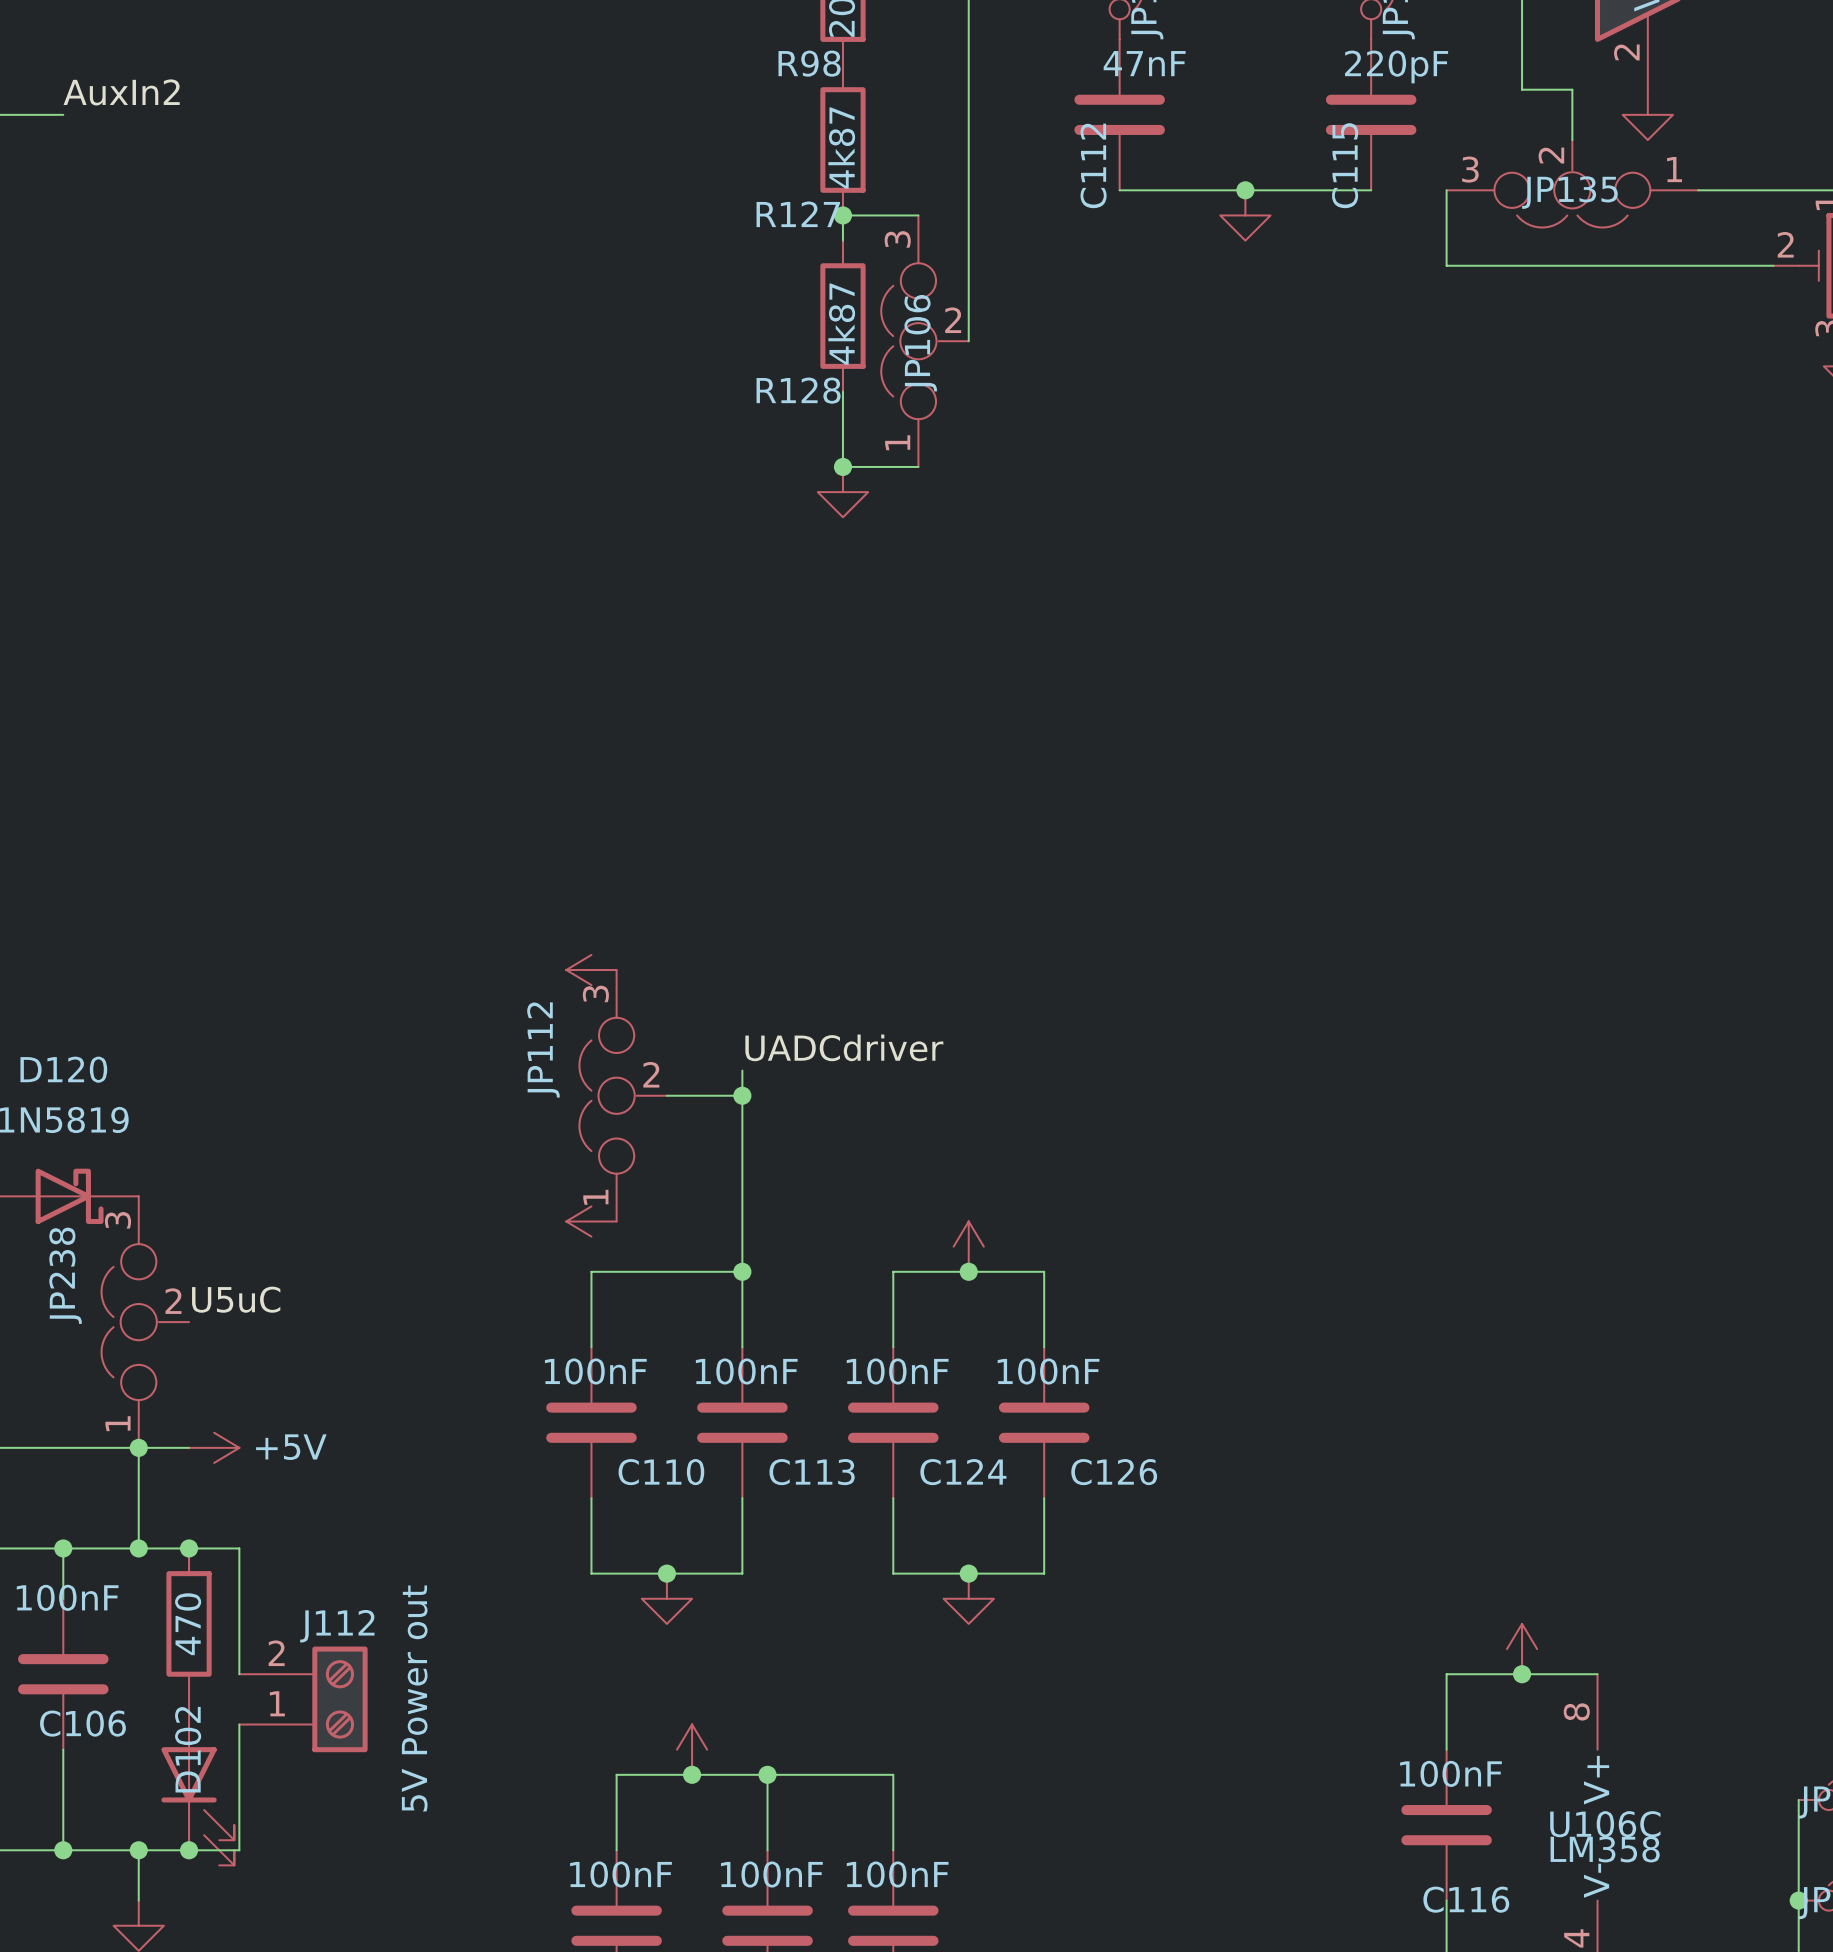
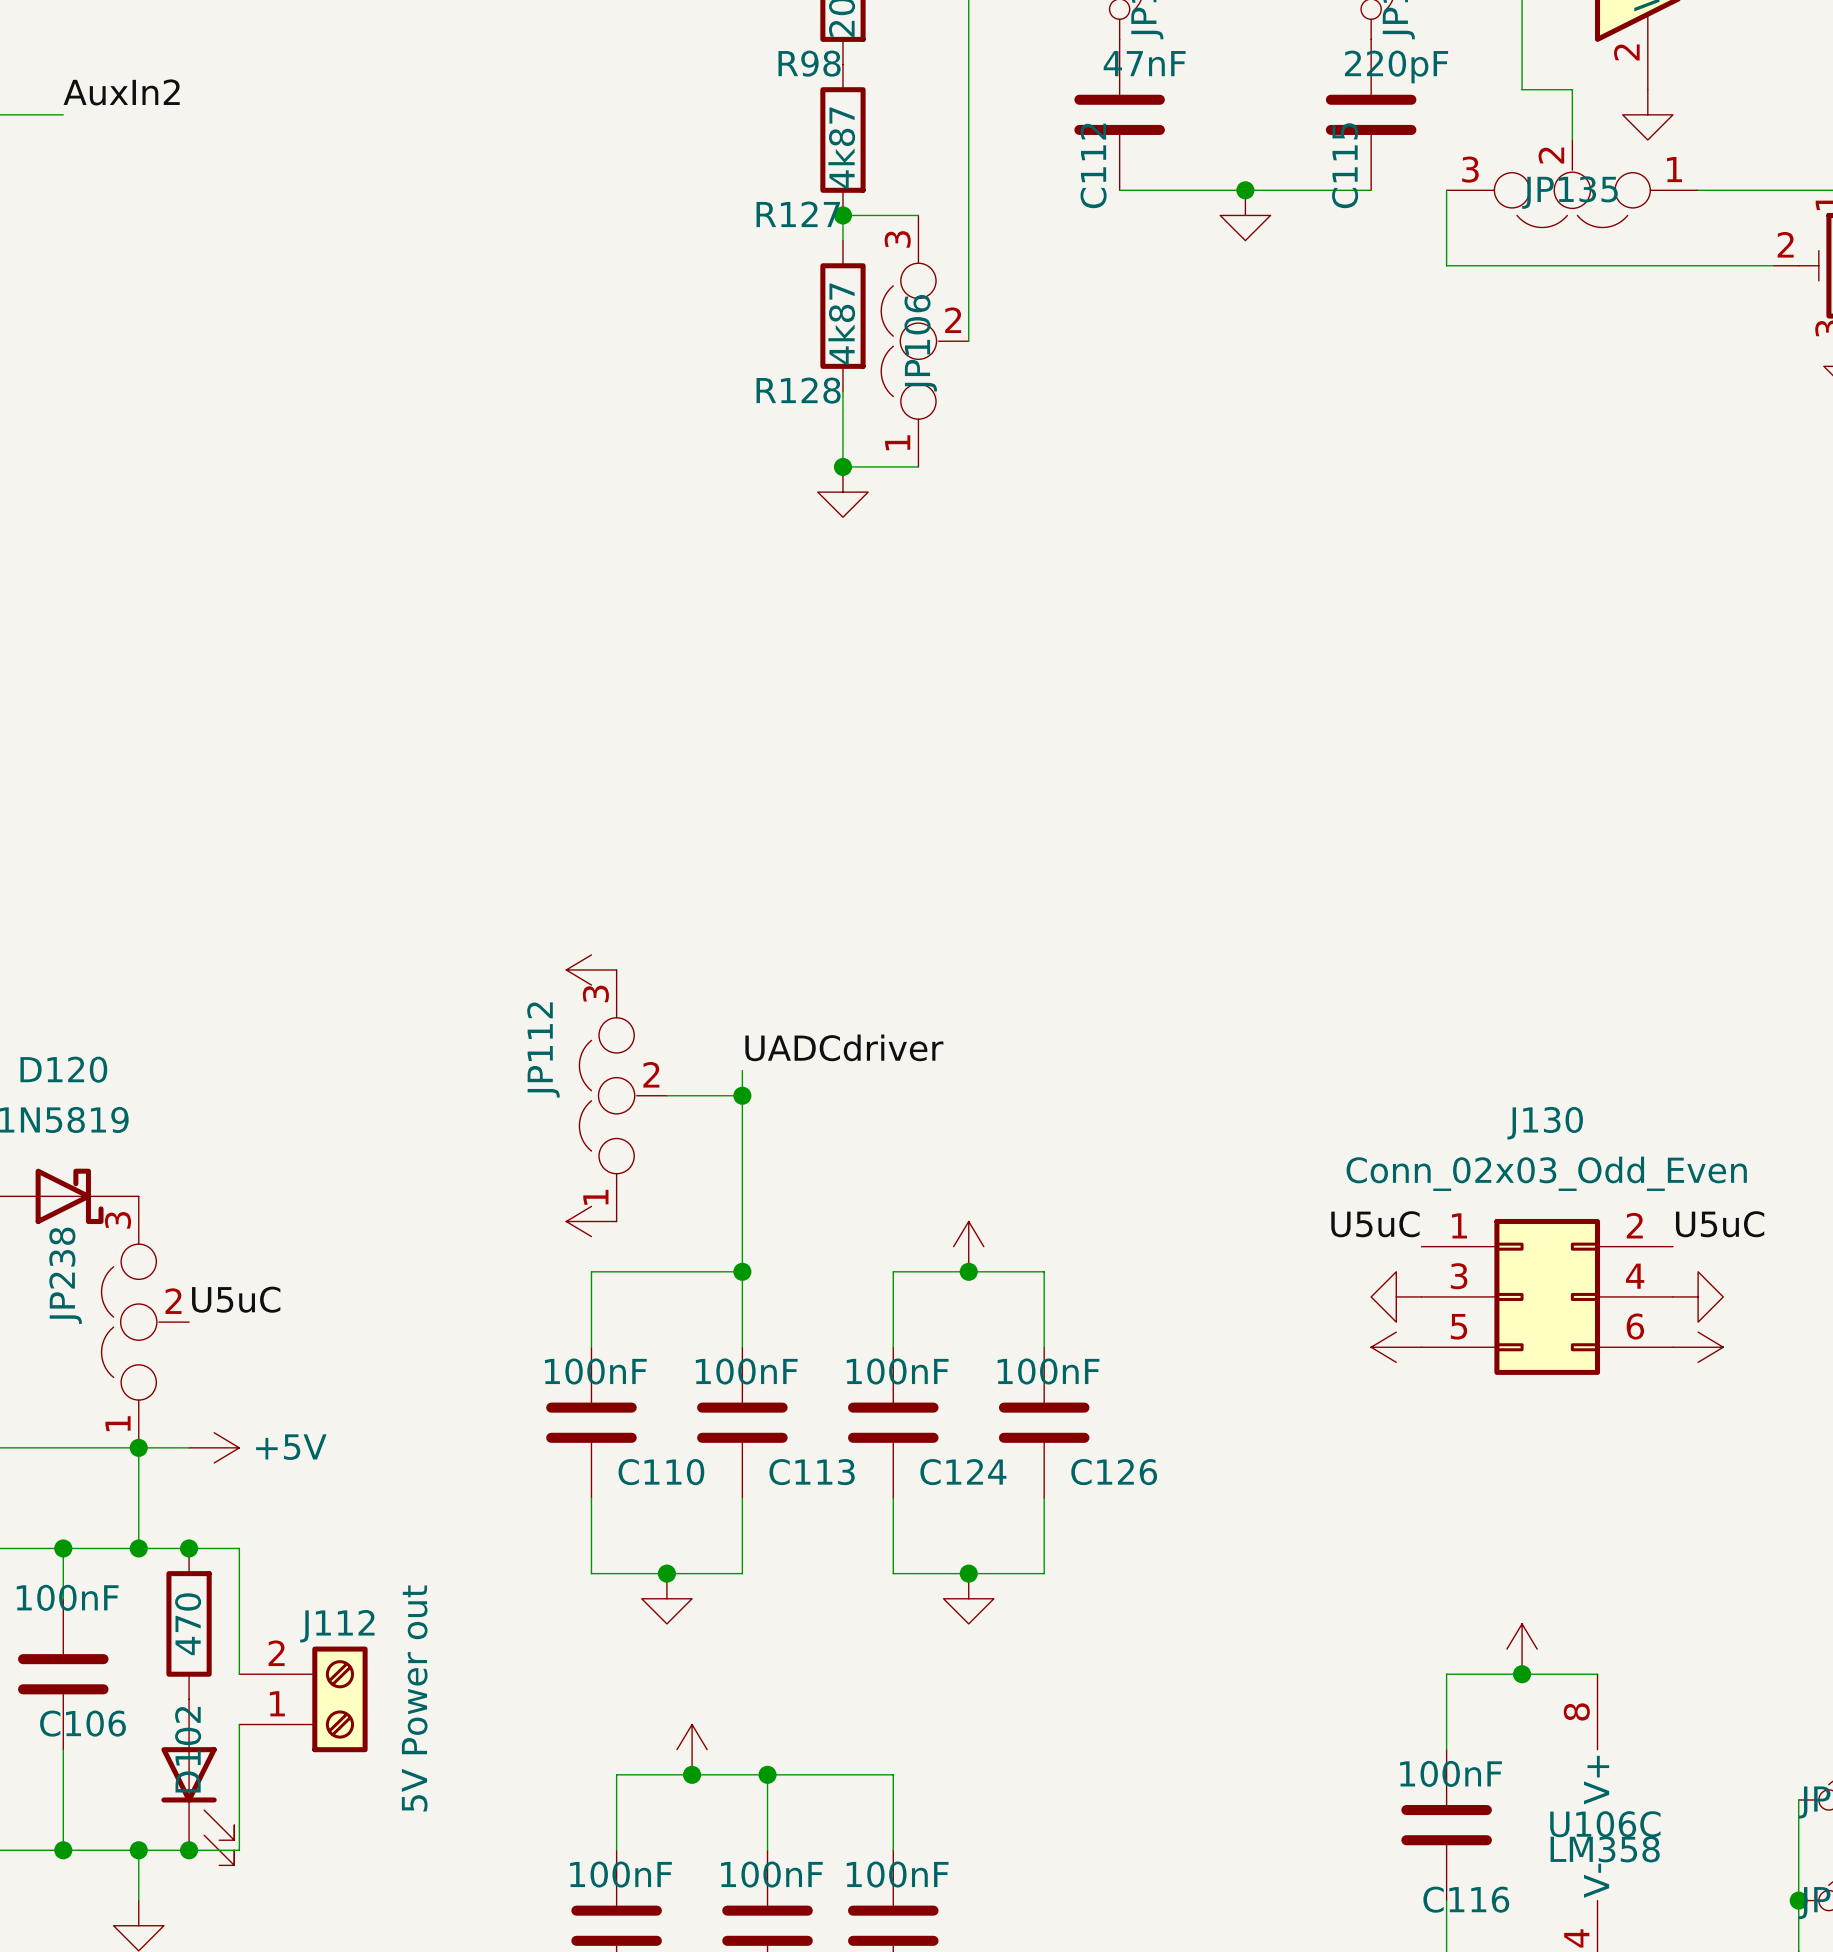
label: none -> U5uC (1375, 1224)
label: none -> U5uC (1720, 1224)
power symbol: none -> (1396, 1296)
J130: none -> Conn_02x03_Odd_Even (1547, 1296)
power symbol: none -> (1698, 1296)
power symbol: none -> (1396, 1347)
power symbol: none -> (1698, 1347)

